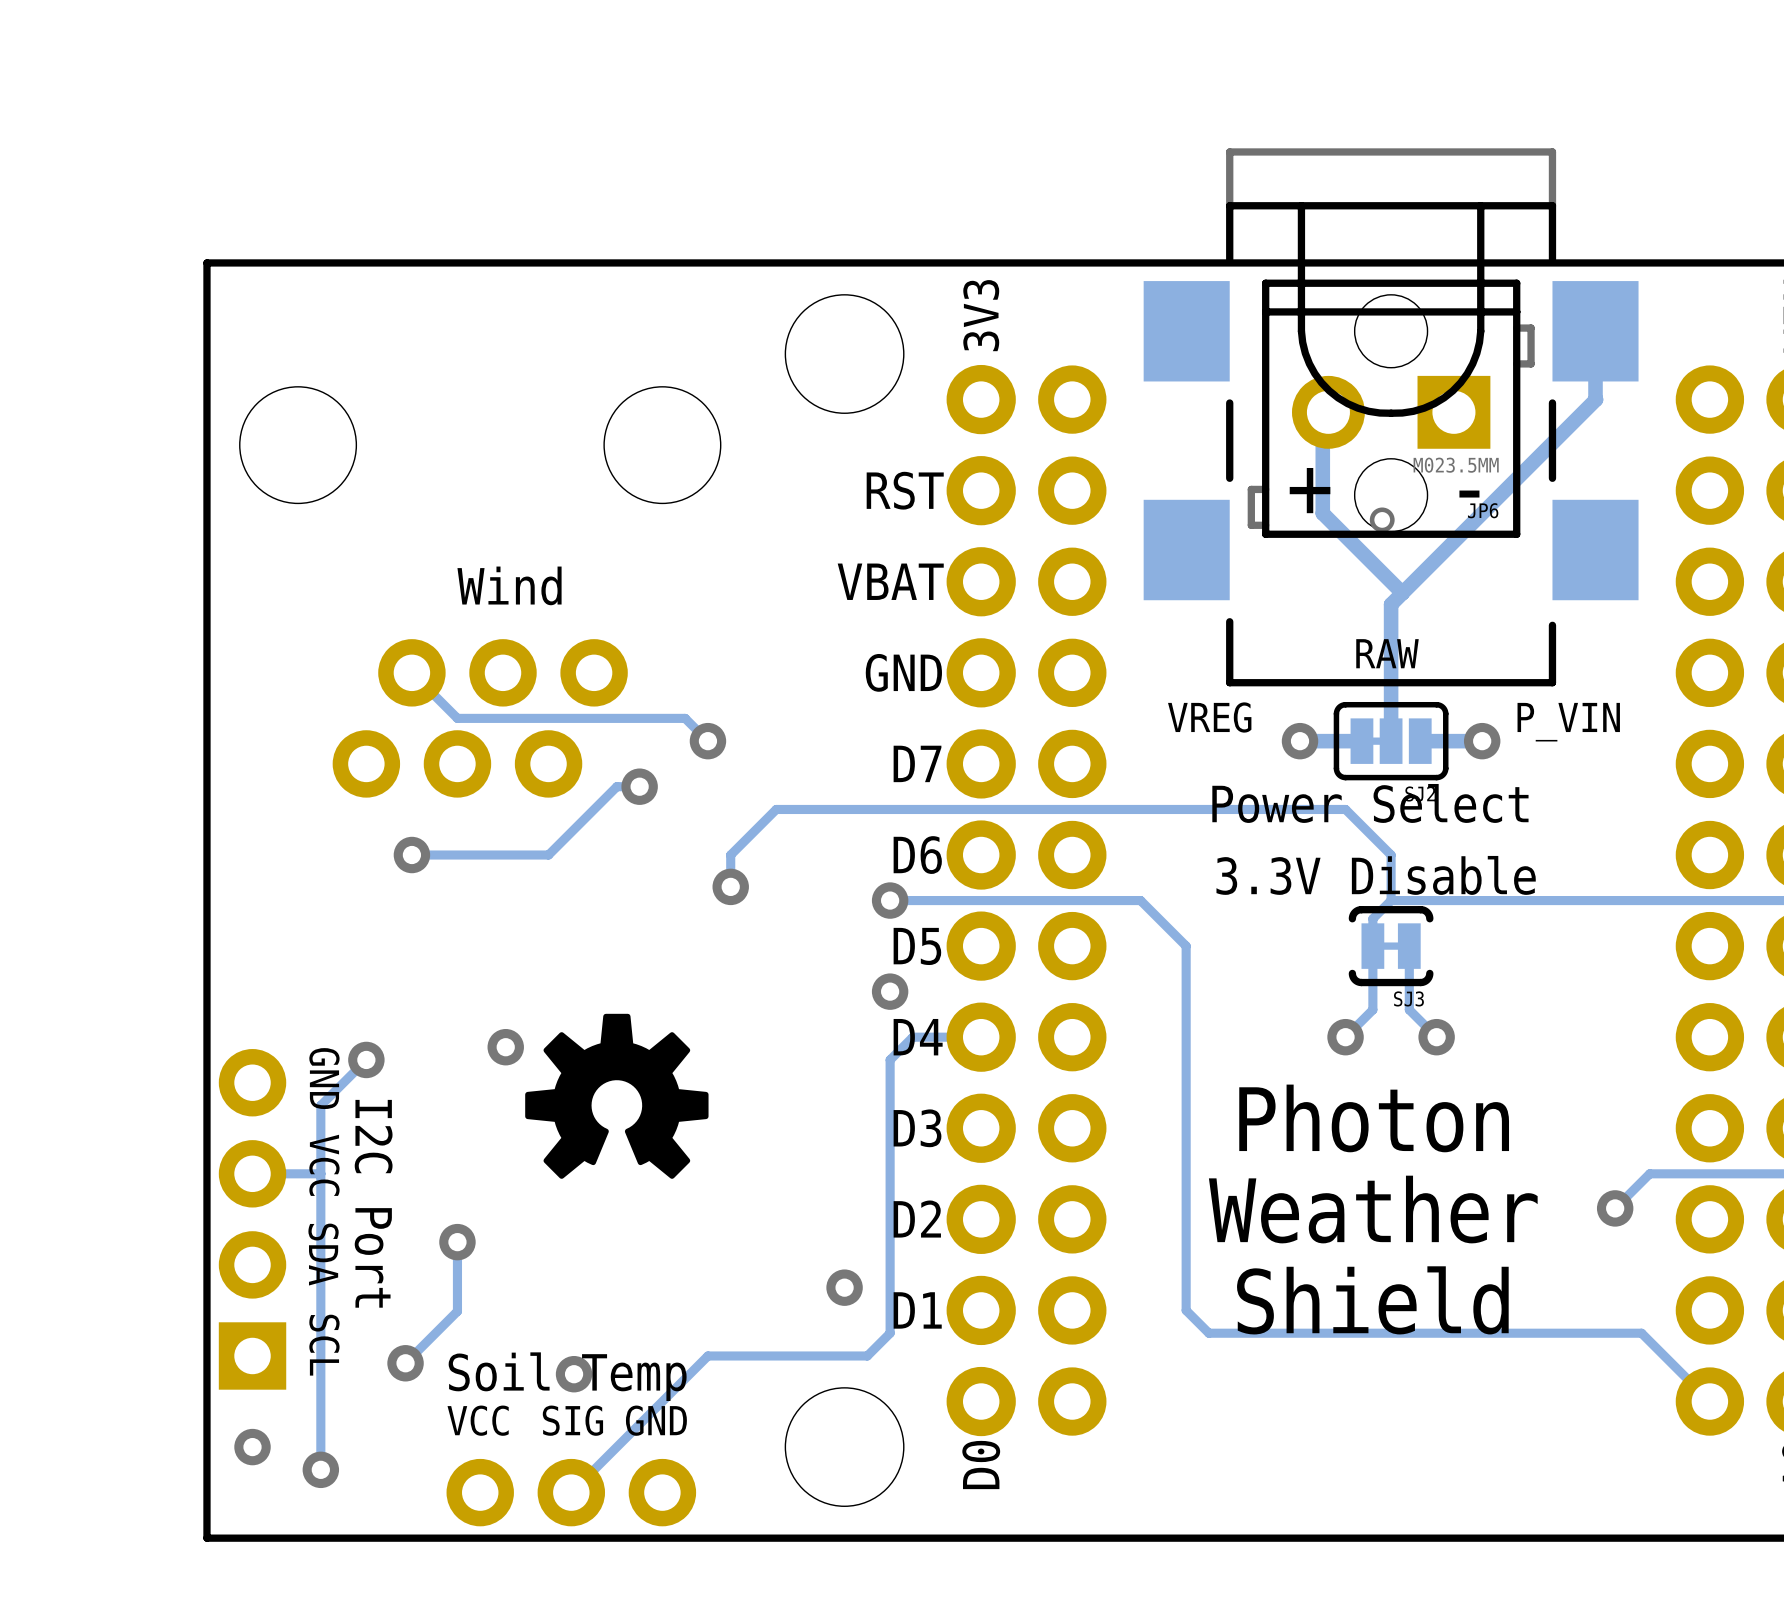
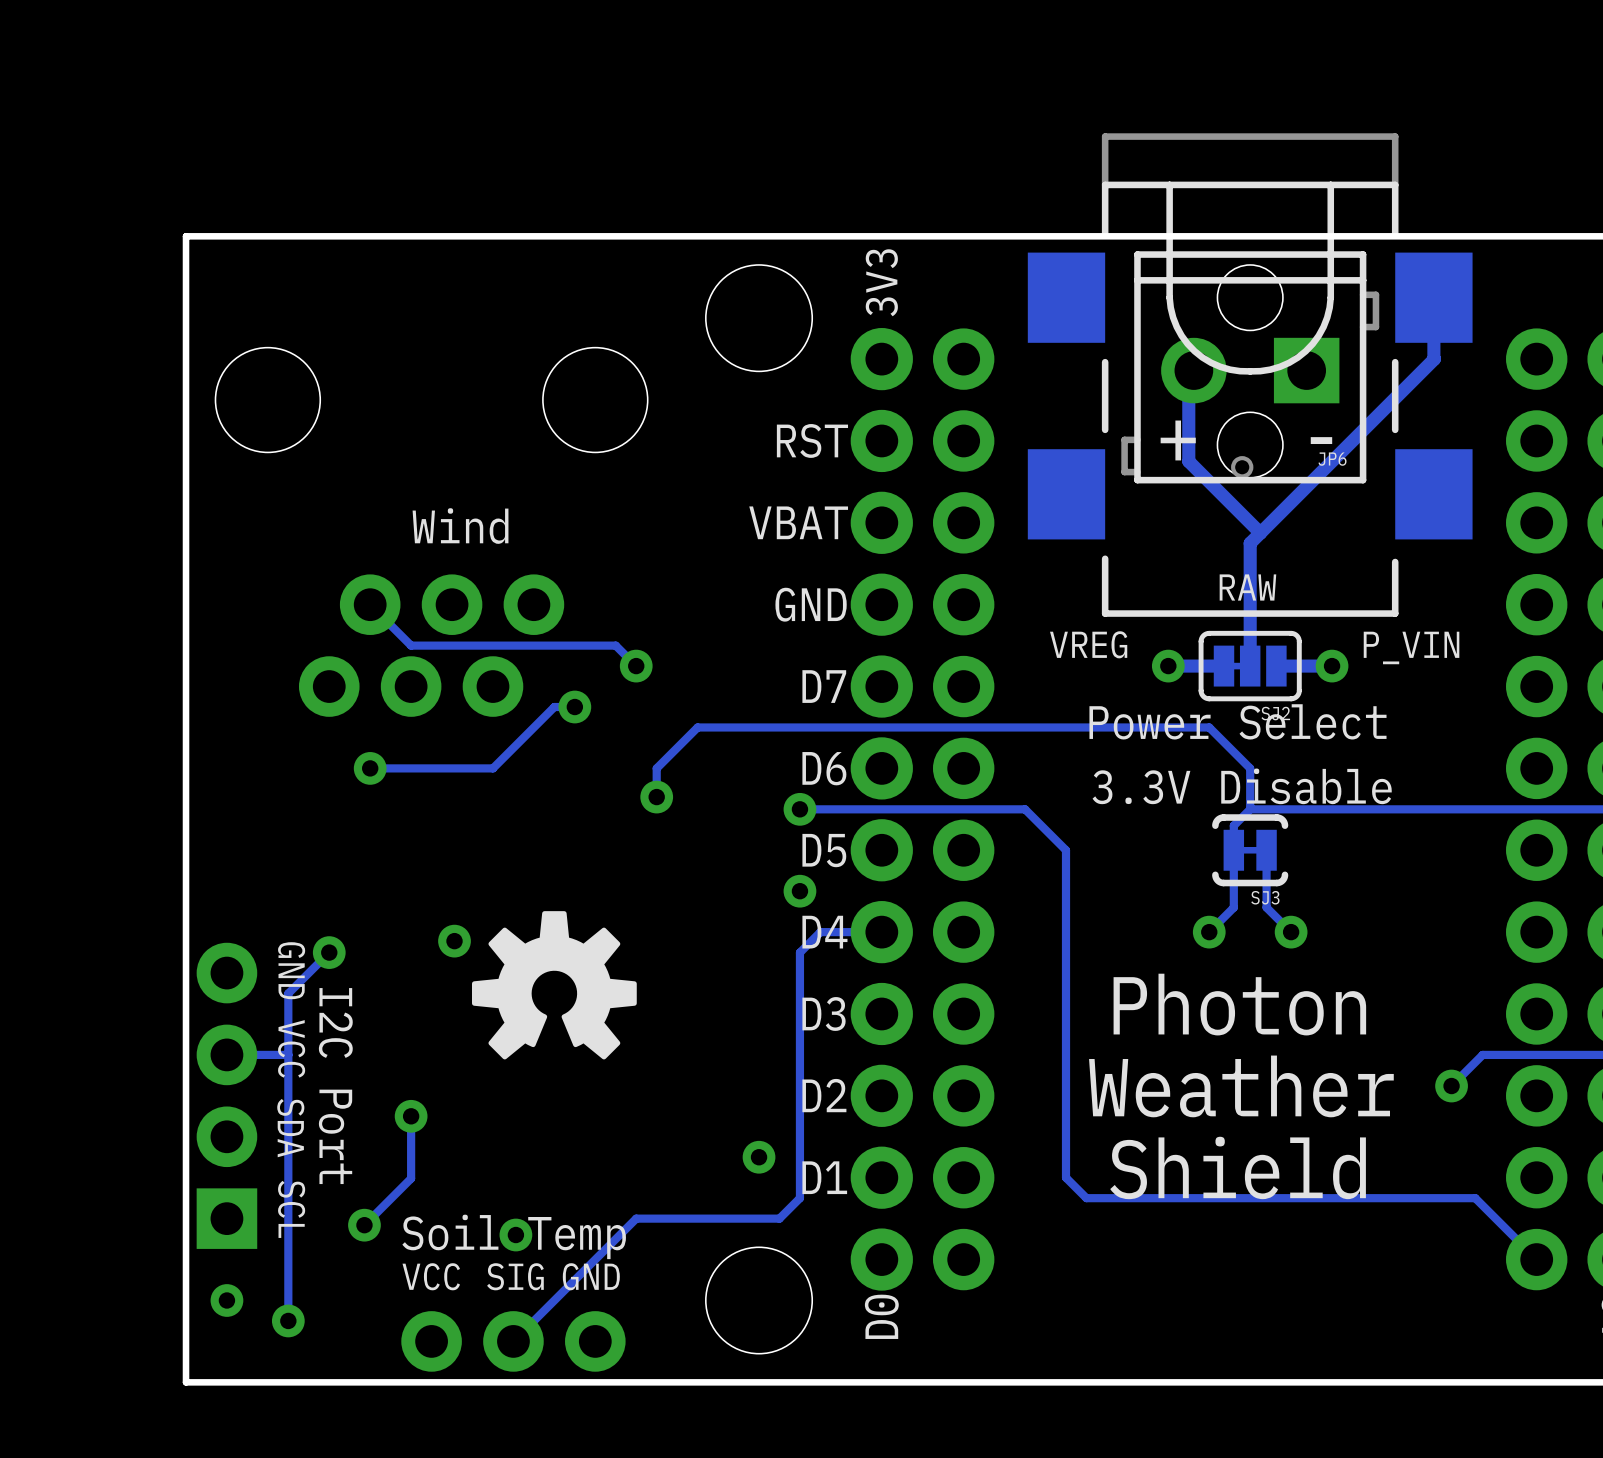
JP6 value: M023.5MM (1456, 465) -> none

